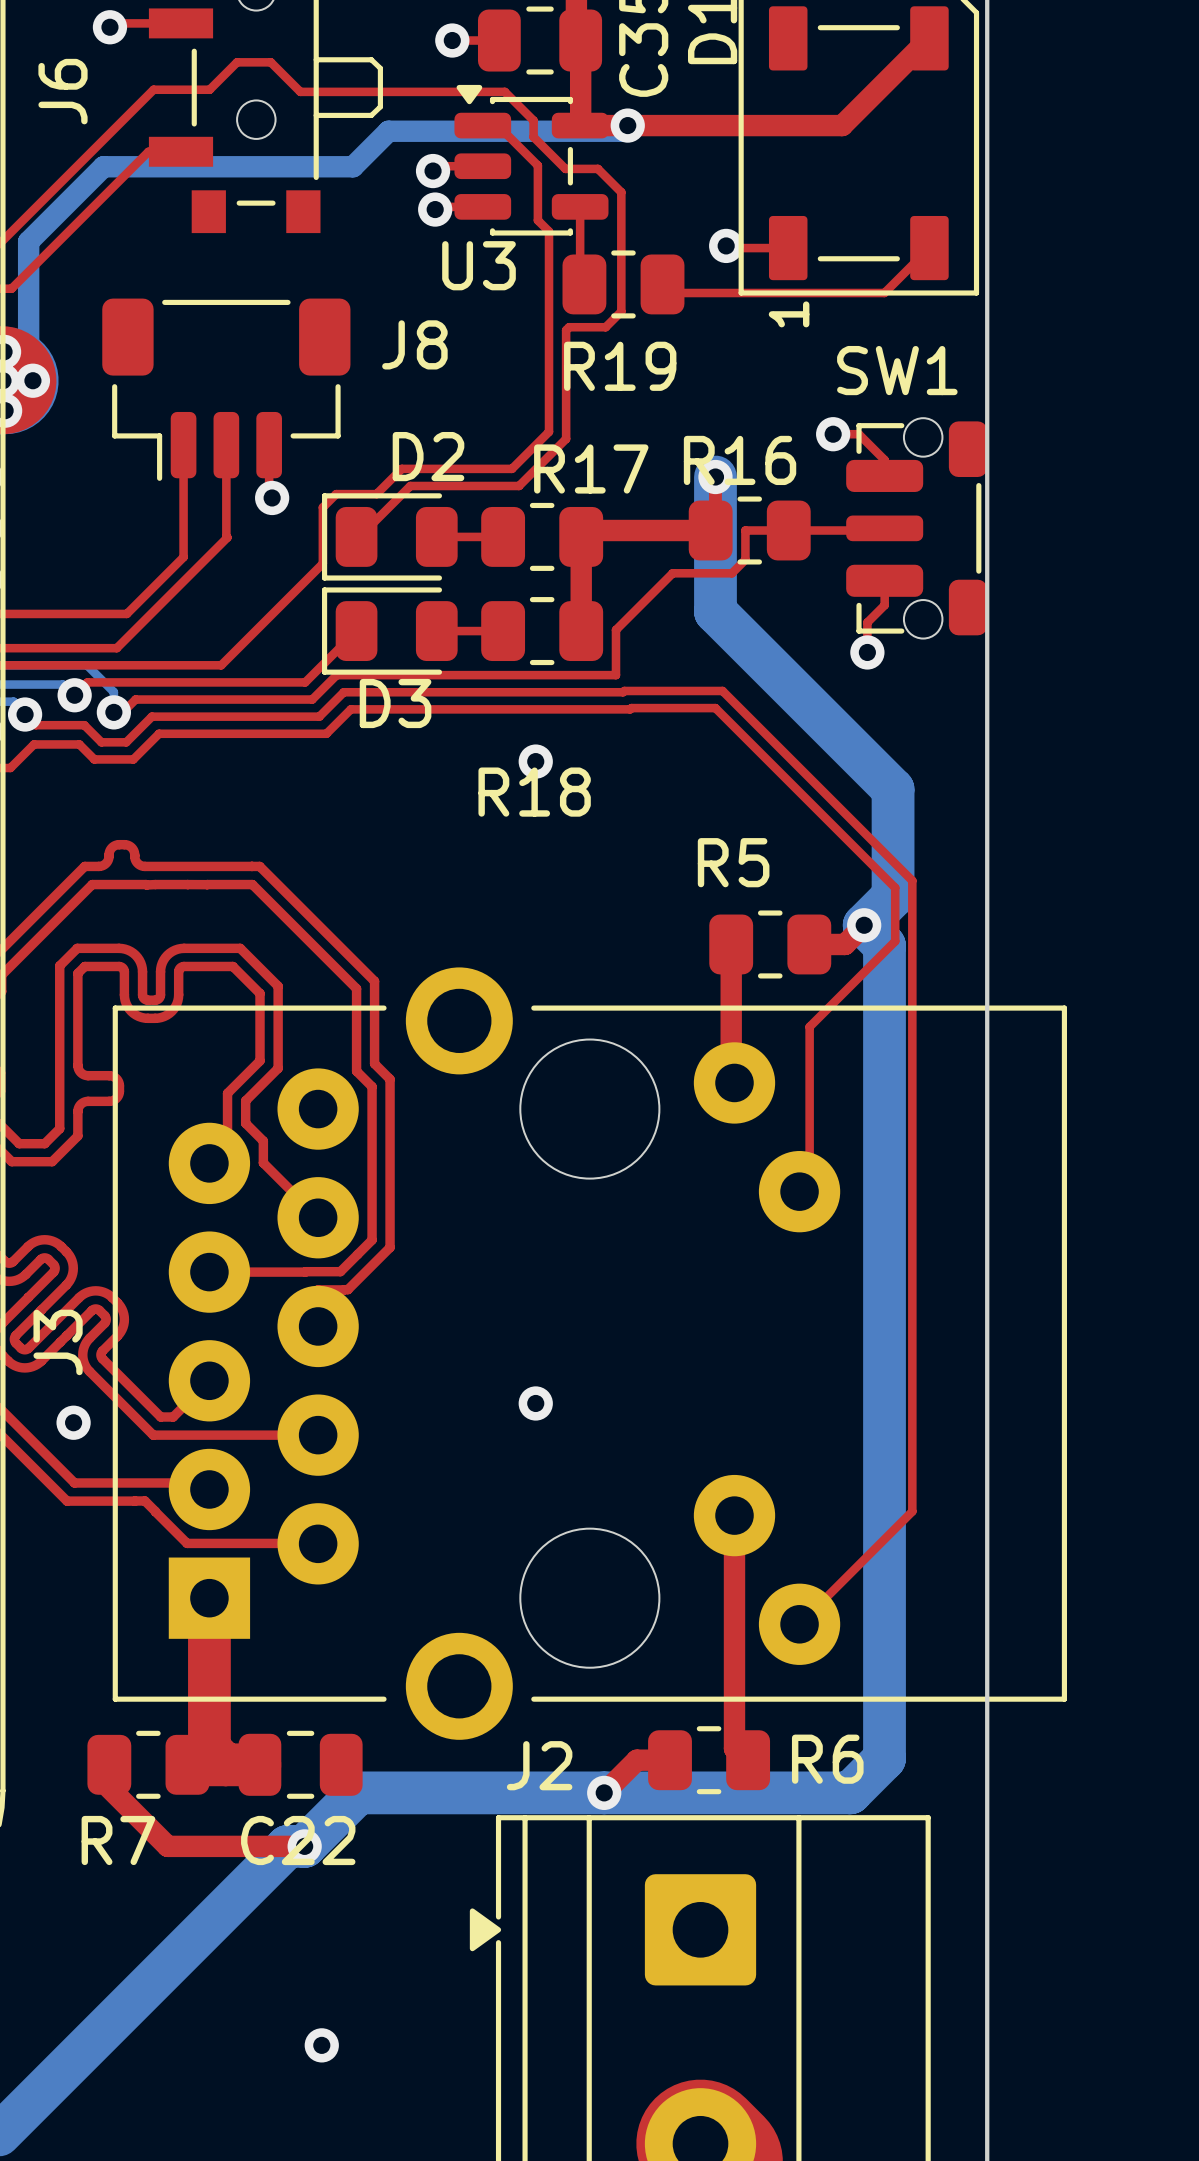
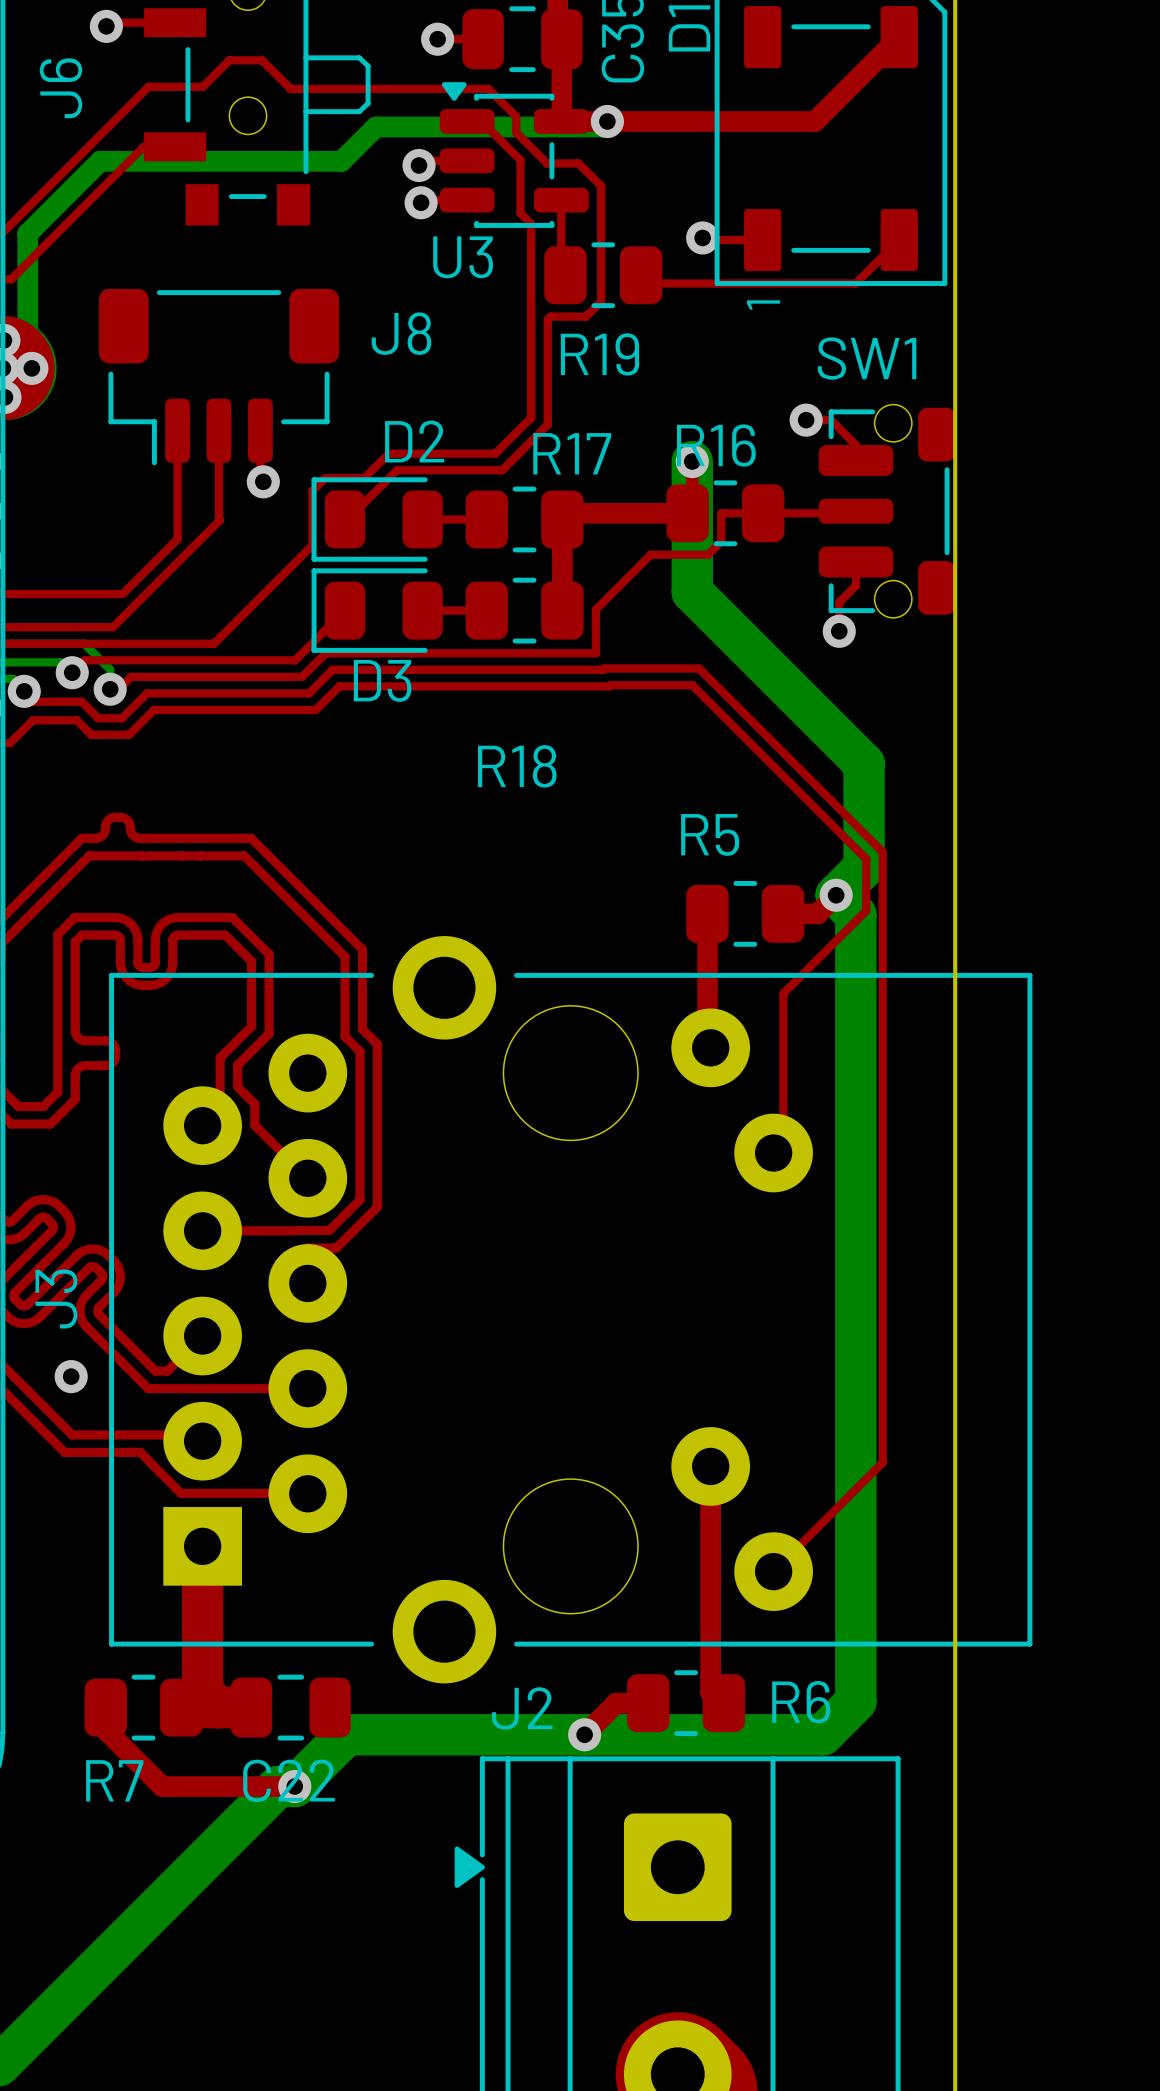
via: (535, 761) -> none
via: (535, 1403) -> none
via: (321, 2045) -> none

